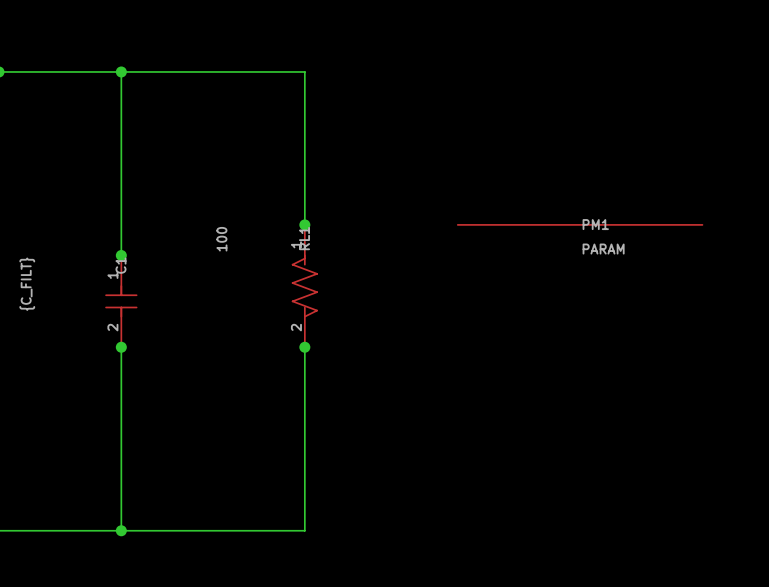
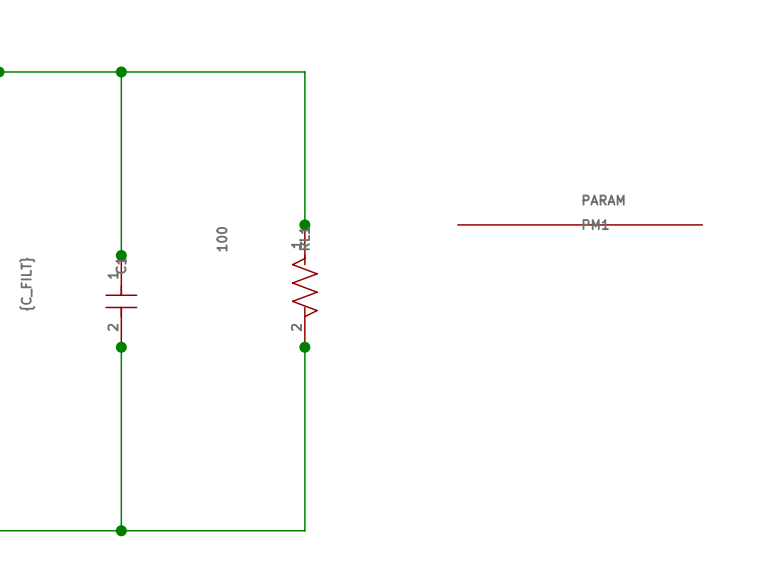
PM1 value position: PARAM (603, 249) -> PARAM (603, 200)

